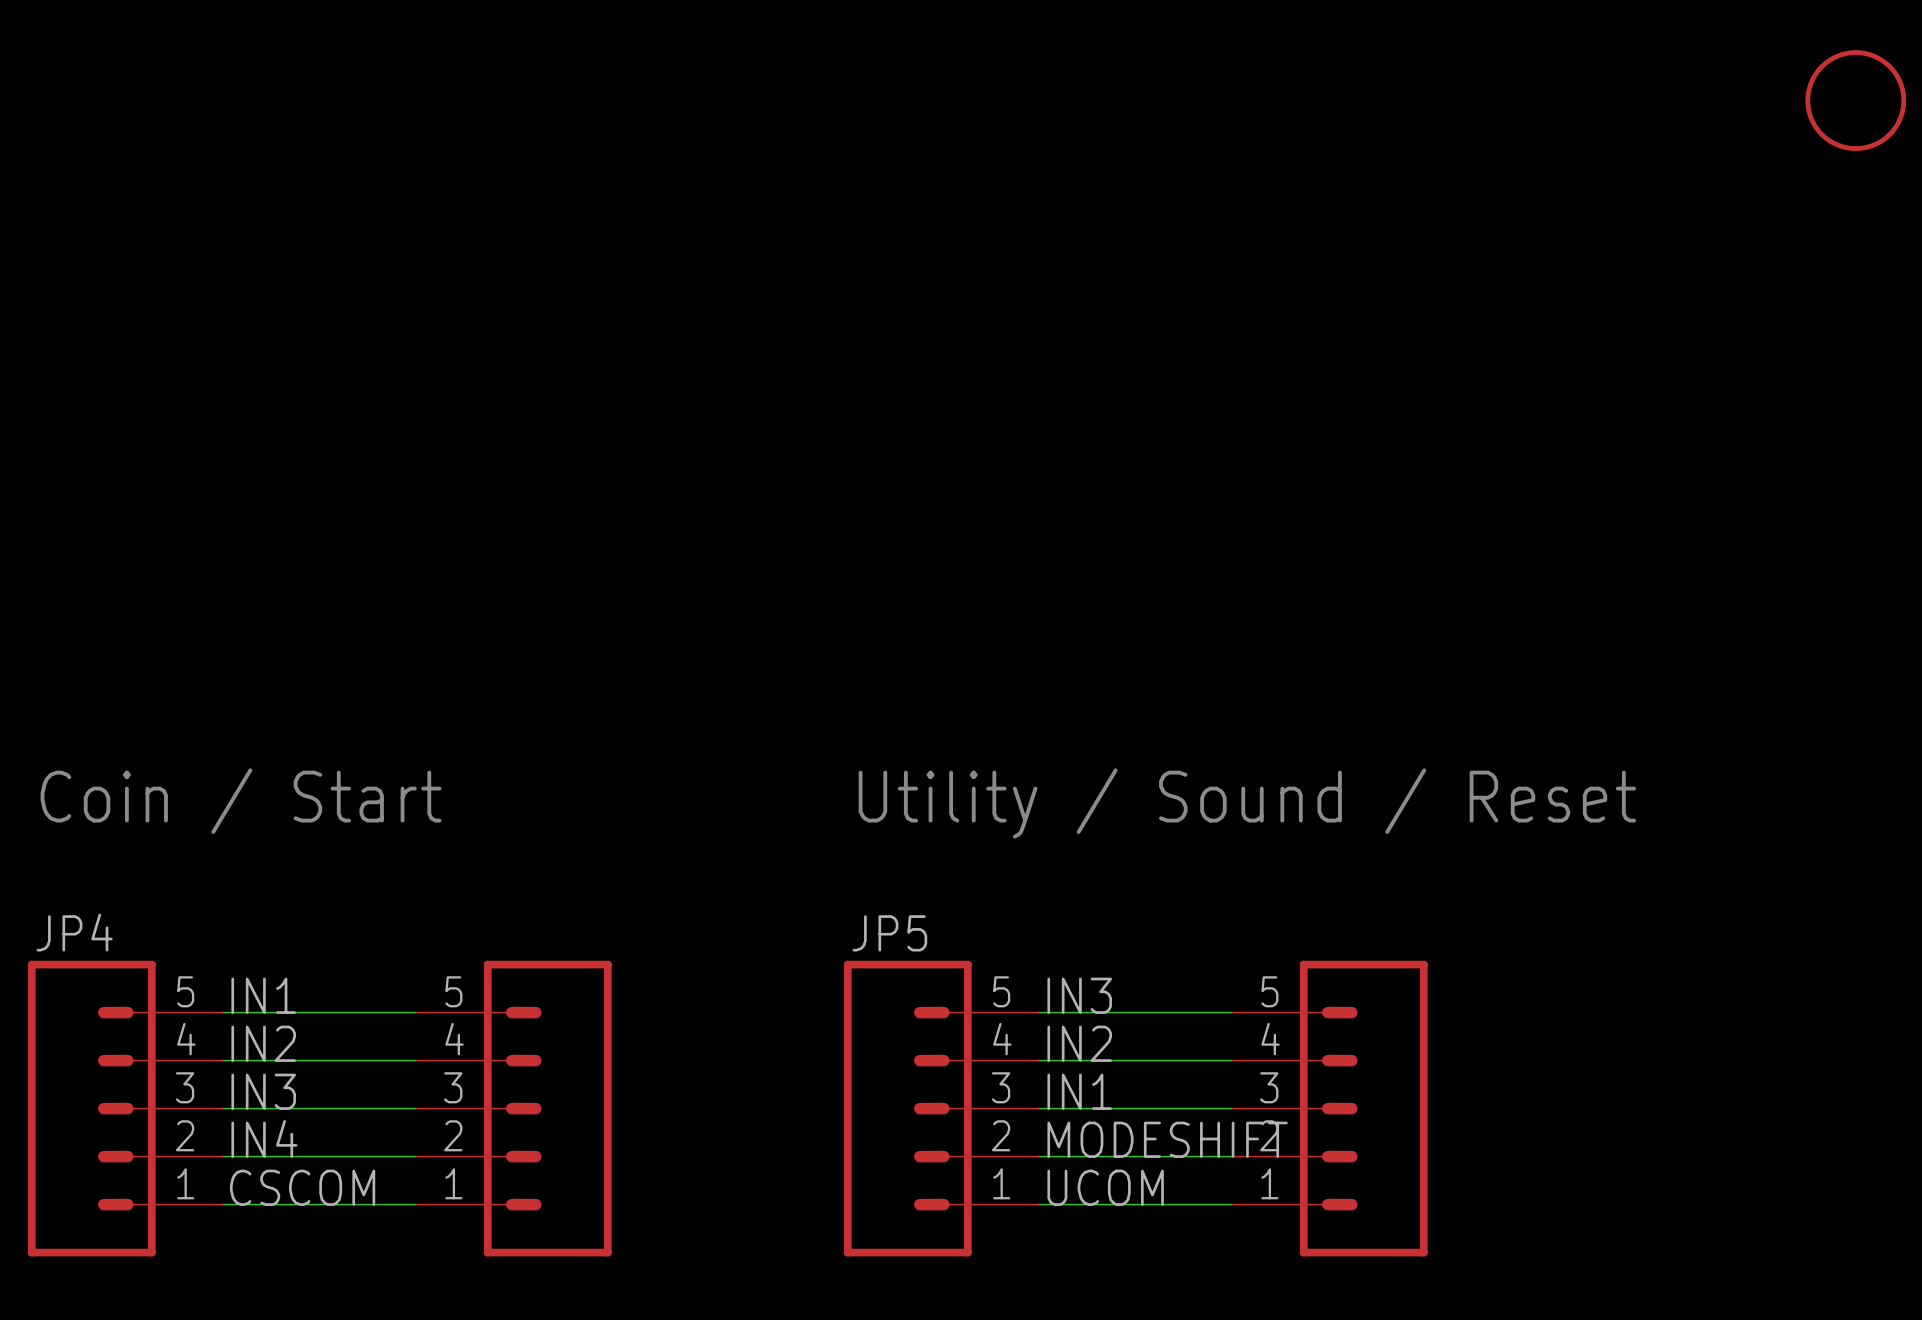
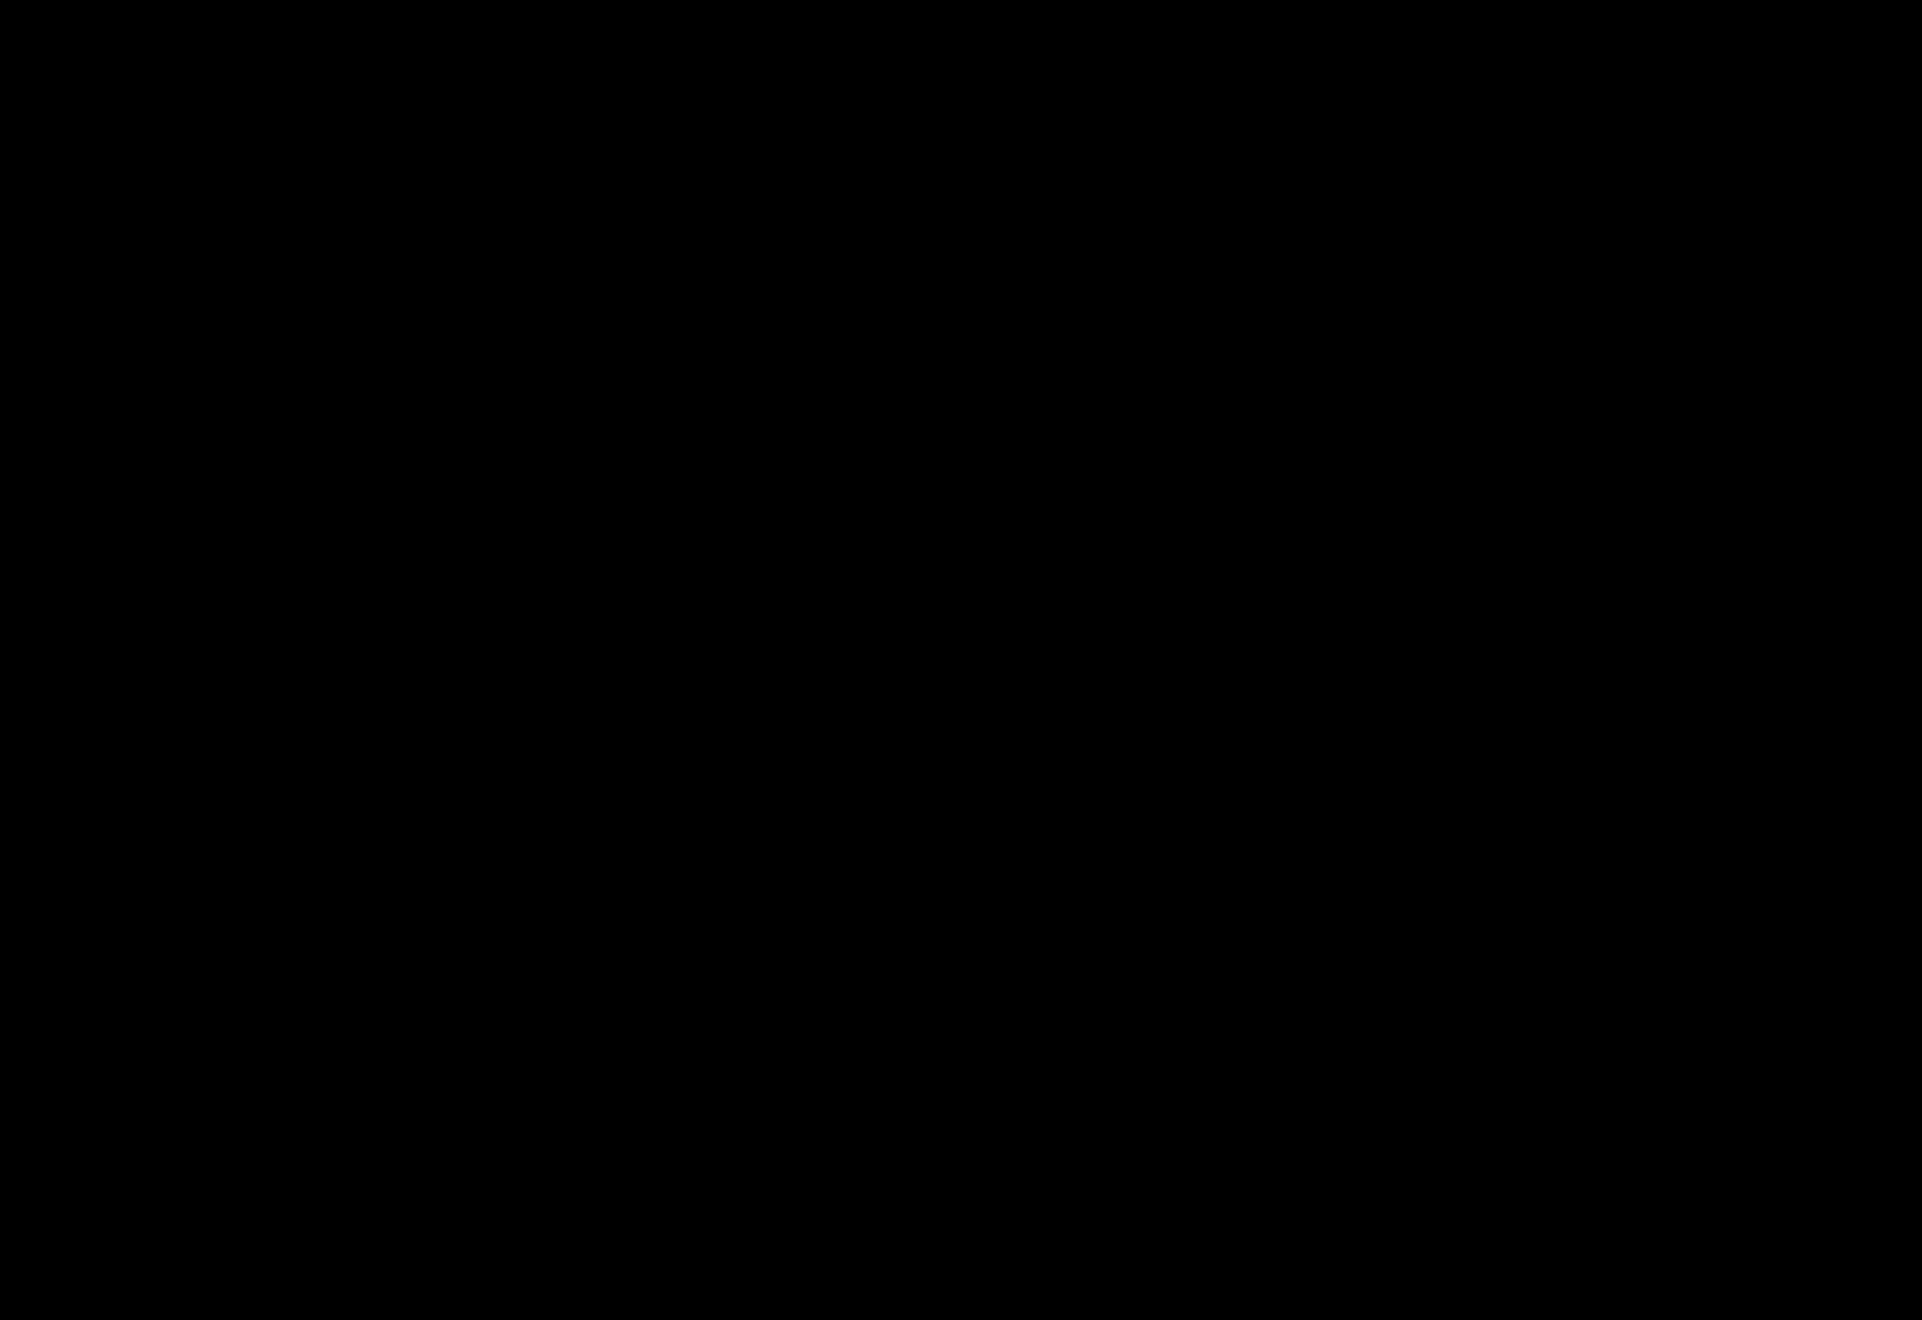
part: (1855, 100) -> none
text: Coin / Start (241, 801) -> none
text: Utility / Sound / Reset (1247, 803) -> none
label: IN1 (263, 995) -> none
label: IN3 (1079, 995) -> none
wire: (223, 1012) (415, 1012) -> none
wire: (1039, 1012) (1231, 1012) -> none
label: IN2 (263, 1043) -> none
label: IN2 (1079, 1043) -> none
wire: (223, 1060) (415, 1060) -> none
wire: (1039, 1060) (1231, 1060) -> none
label: IN3 (263, 1091) -> none
label: IN1 (1079, 1091) -> none
JP4: (125, 1108) -> none
wire: (223, 1108) (415, 1108) -> none
part: (513, 1108) -> none
JP5: (941, 1108) -> none
wire: (1039, 1108) (1231, 1108) -> none
part: (1329, 1108) -> none
label: IN4 (264, 1138) -> none
label: MODESHIFT (1167, 1139) -> none
wire: (223, 1156) (415, 1156) -> none
wire: (1039, 1156) (1231, 1156) -> none
label: CSCOM (302, 1187) -> none
label: UCOM (1105, 1187) -> none
wire: (223, 1204) (415, 1204) -> none
wire: (1039, 1204) (1231, 1204) -> none

